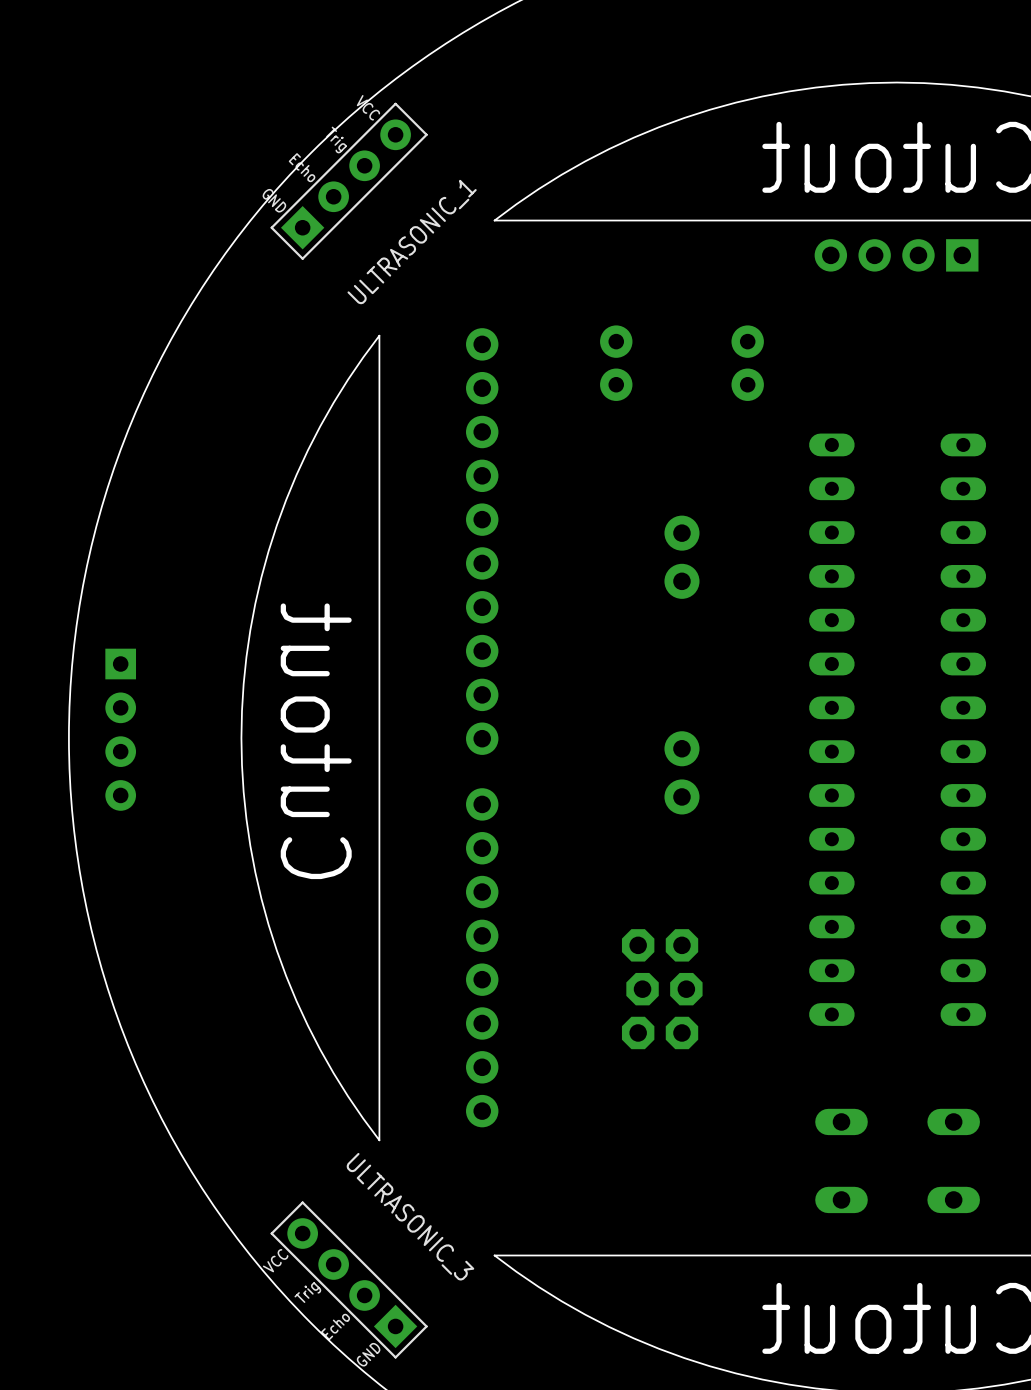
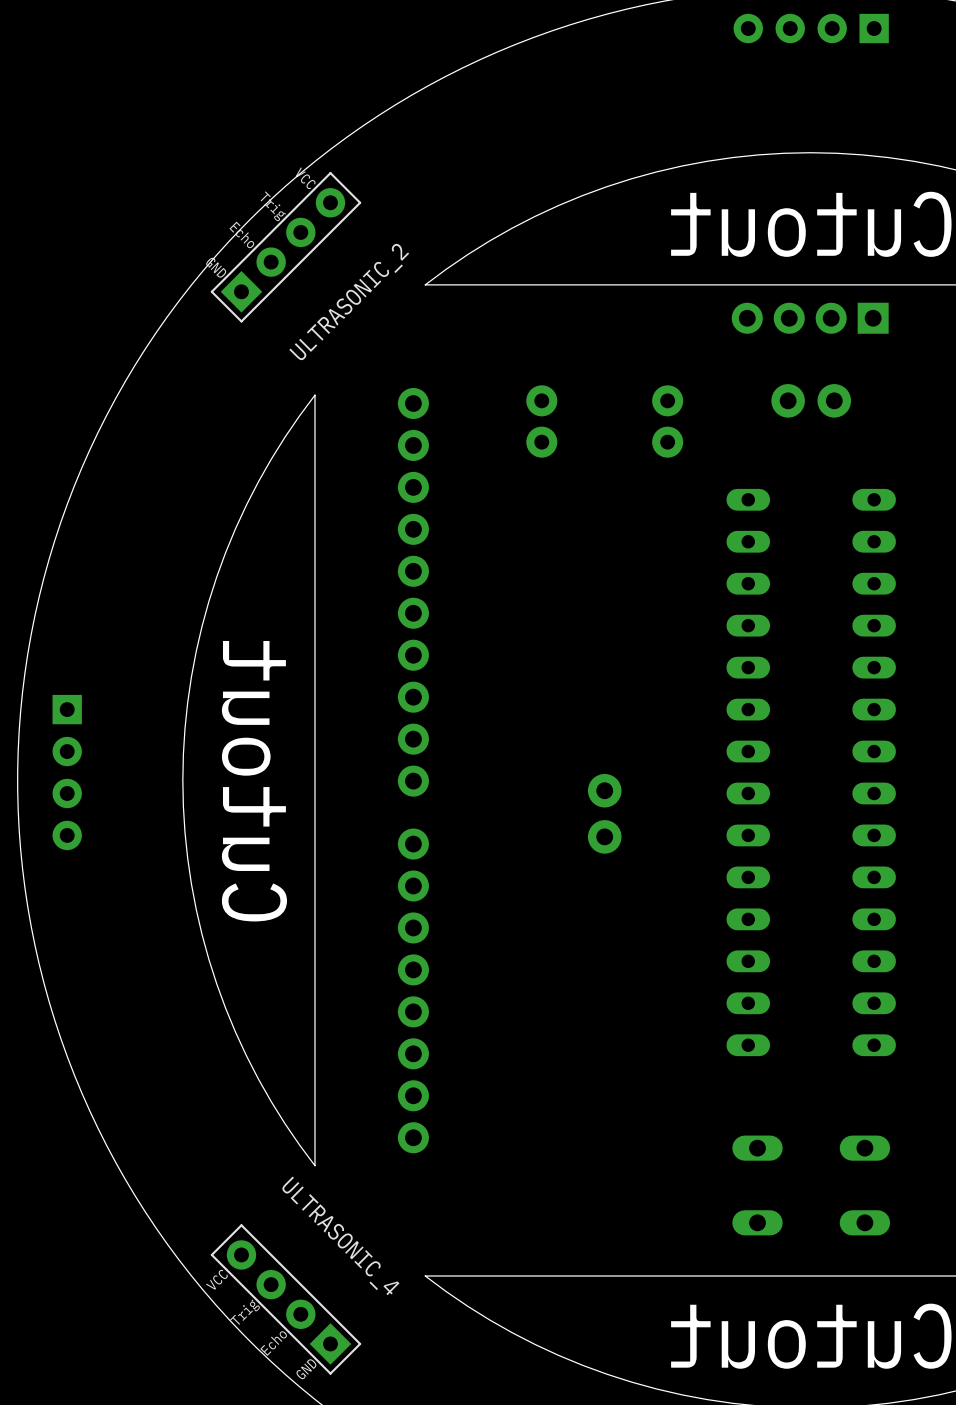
ULTRASONIC_1 name: ULTRASONIC_1 (412, 242) -> ULTRASONIC_2 (349, 302)
part rotation: 0° (681, 557) -> 90° clockwise (811, 400)
part position: (681, 557) -> (811, 400)
part: (662, 989) -> none
ULTRASONIC_3 name: ULTRASONIC_3 (410, 1216) -> ULTRASONIC_4 (340, 1235)

